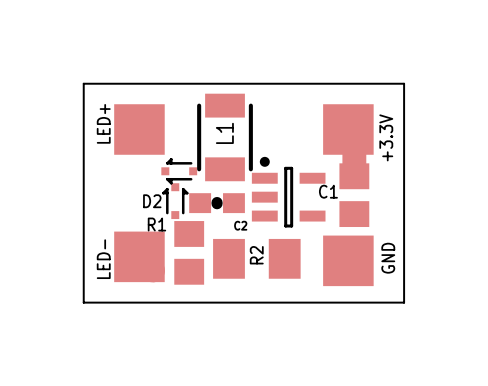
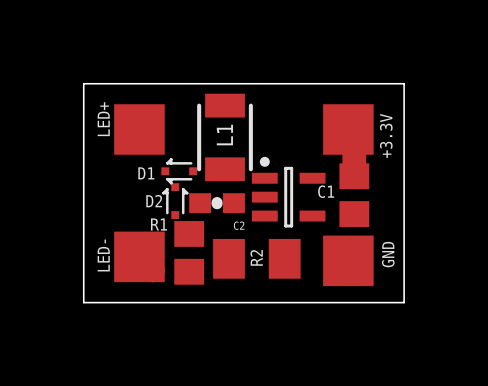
part text: none -> D1 (146, 173)

